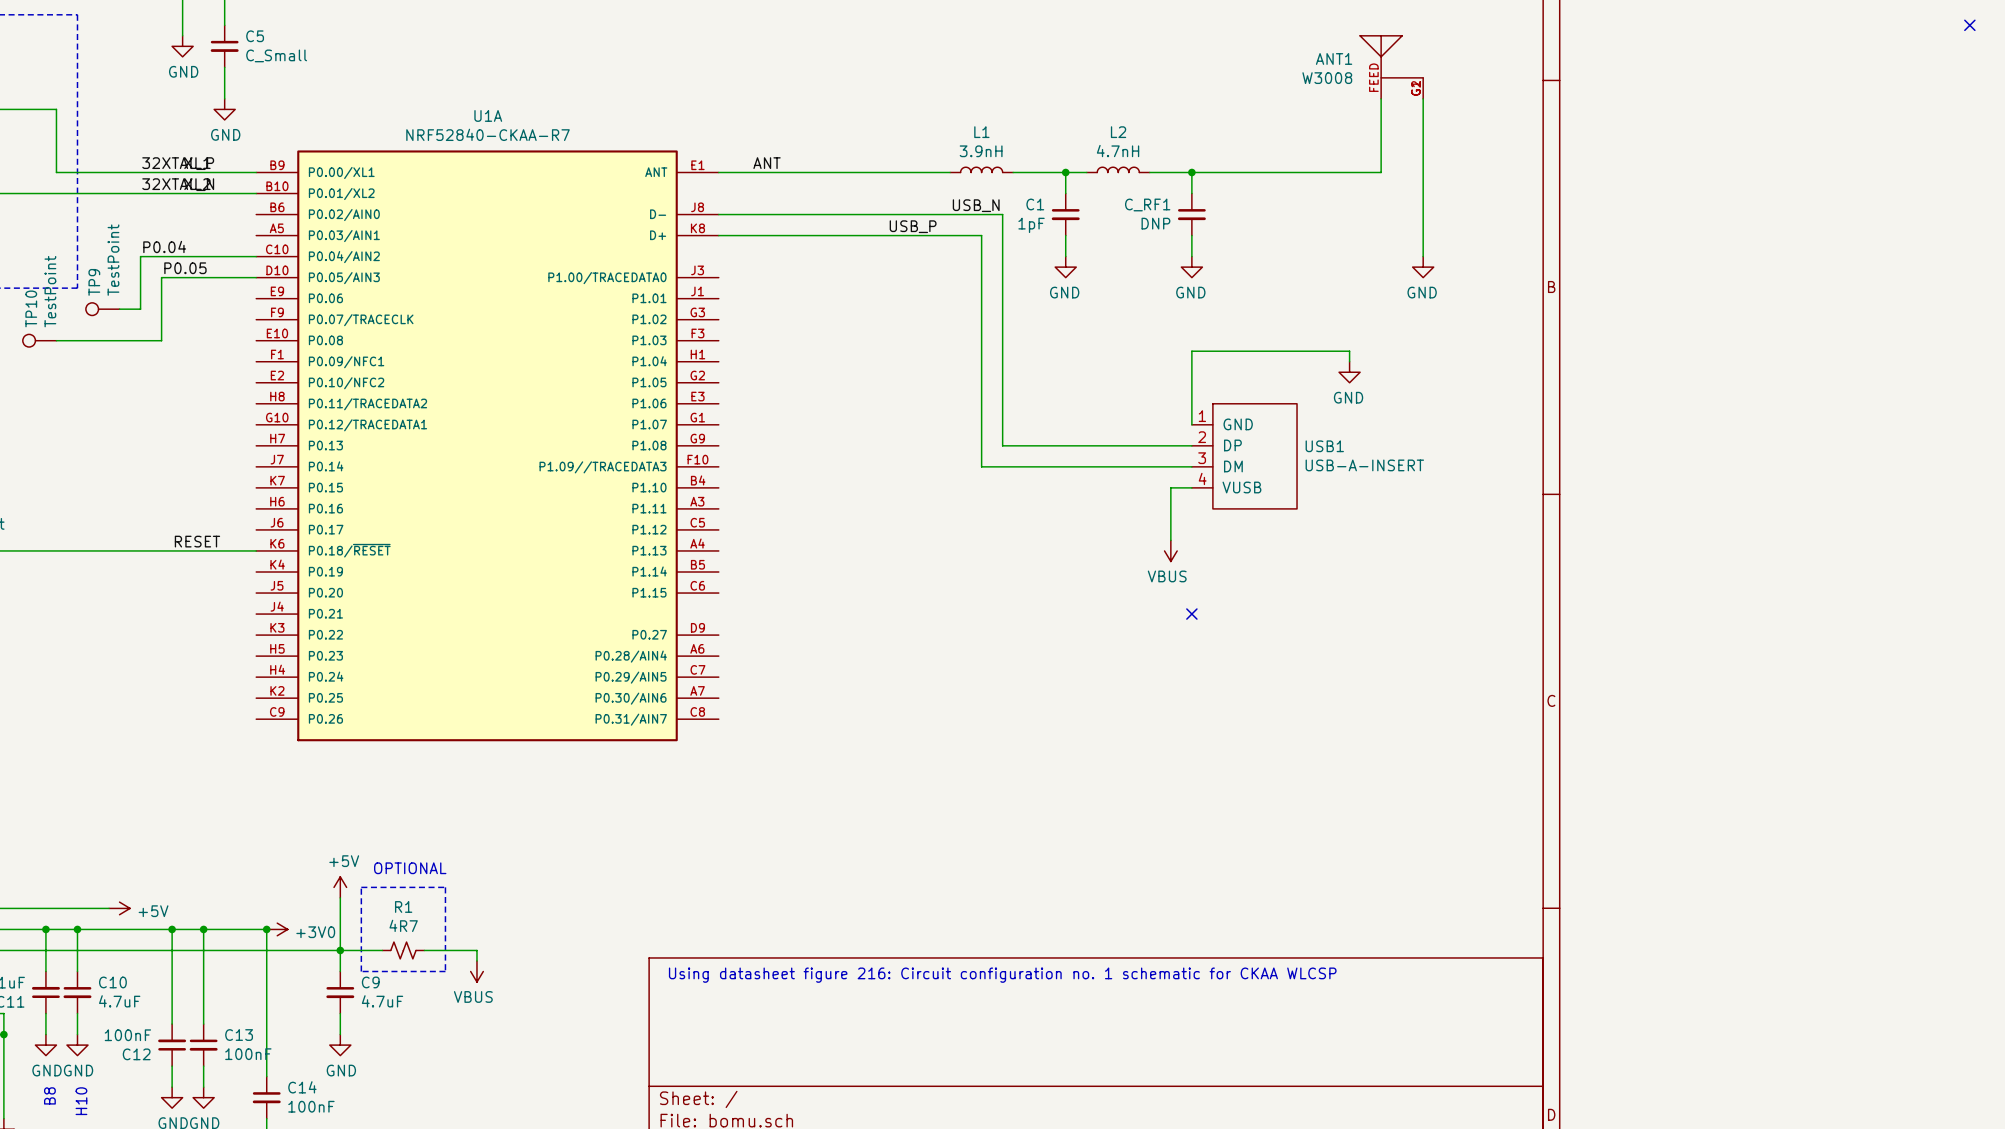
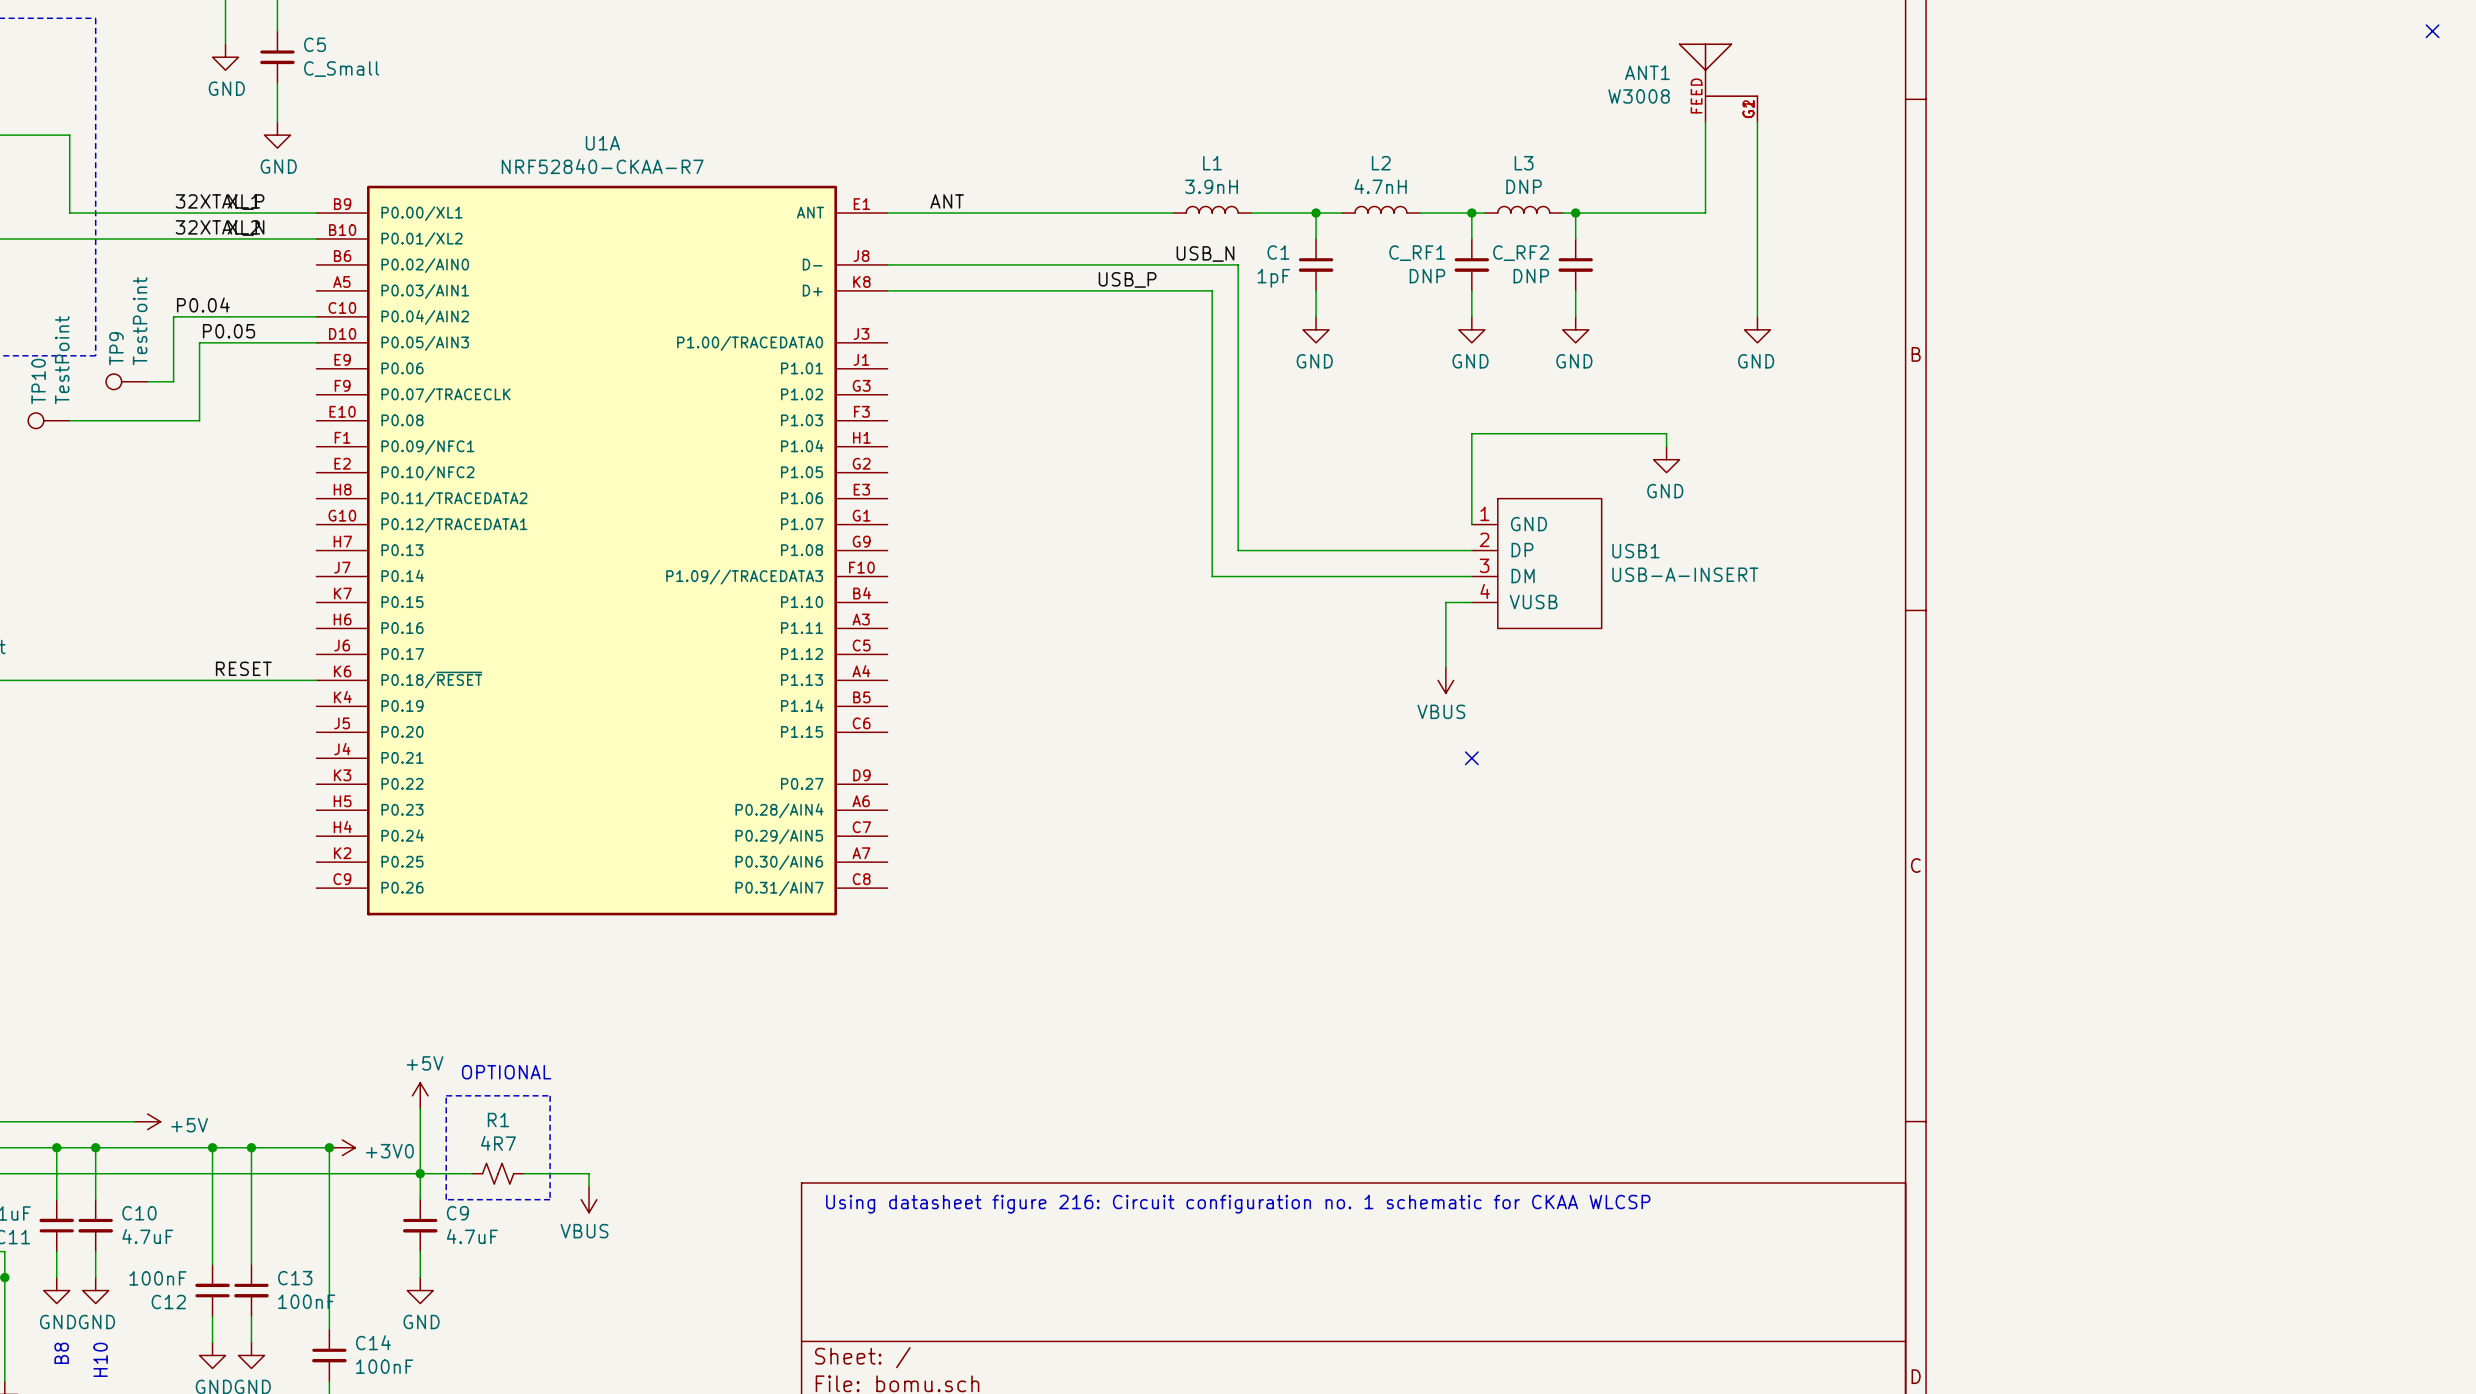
L3: none -> DNP (1523, 209)
wire: (1202, 172) (1265, 172) -> none
wire: none -> (1575, 213) (1575, 238)
junction: none -> (1575, 213)
C_RF2: none -> DNP (1575, 264)
wire: none -> (1575, 290) (1575, 316)
power symbol: none -> GND (1575, 329)

